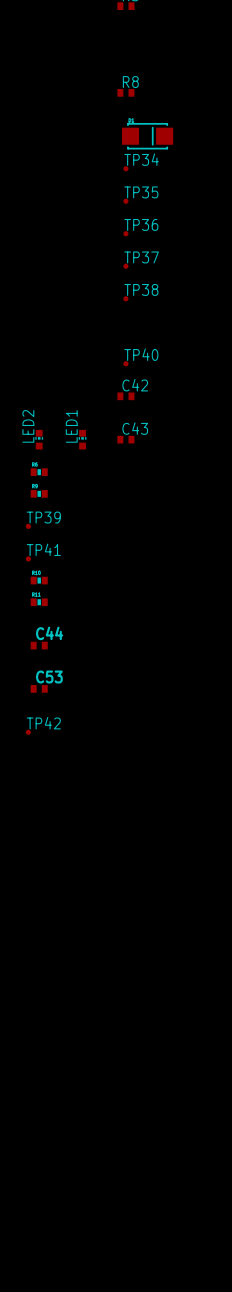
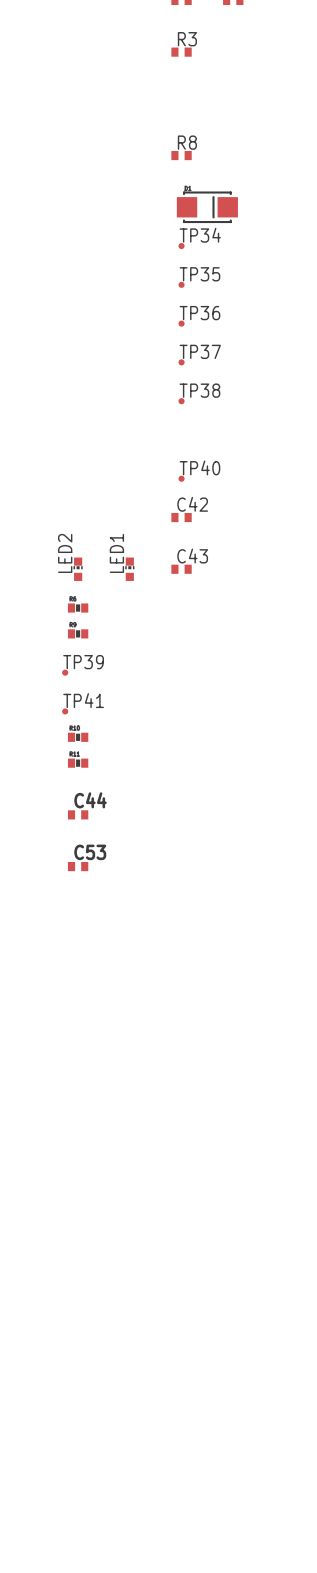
TP42: (28, 732) -> none

